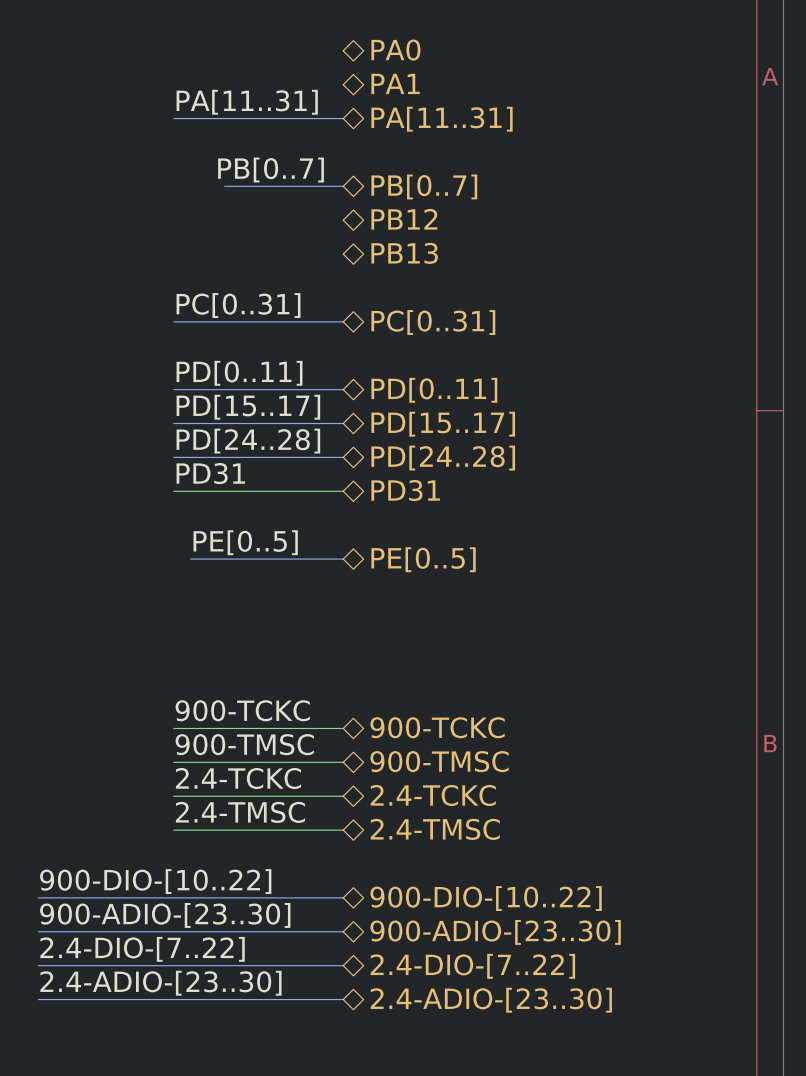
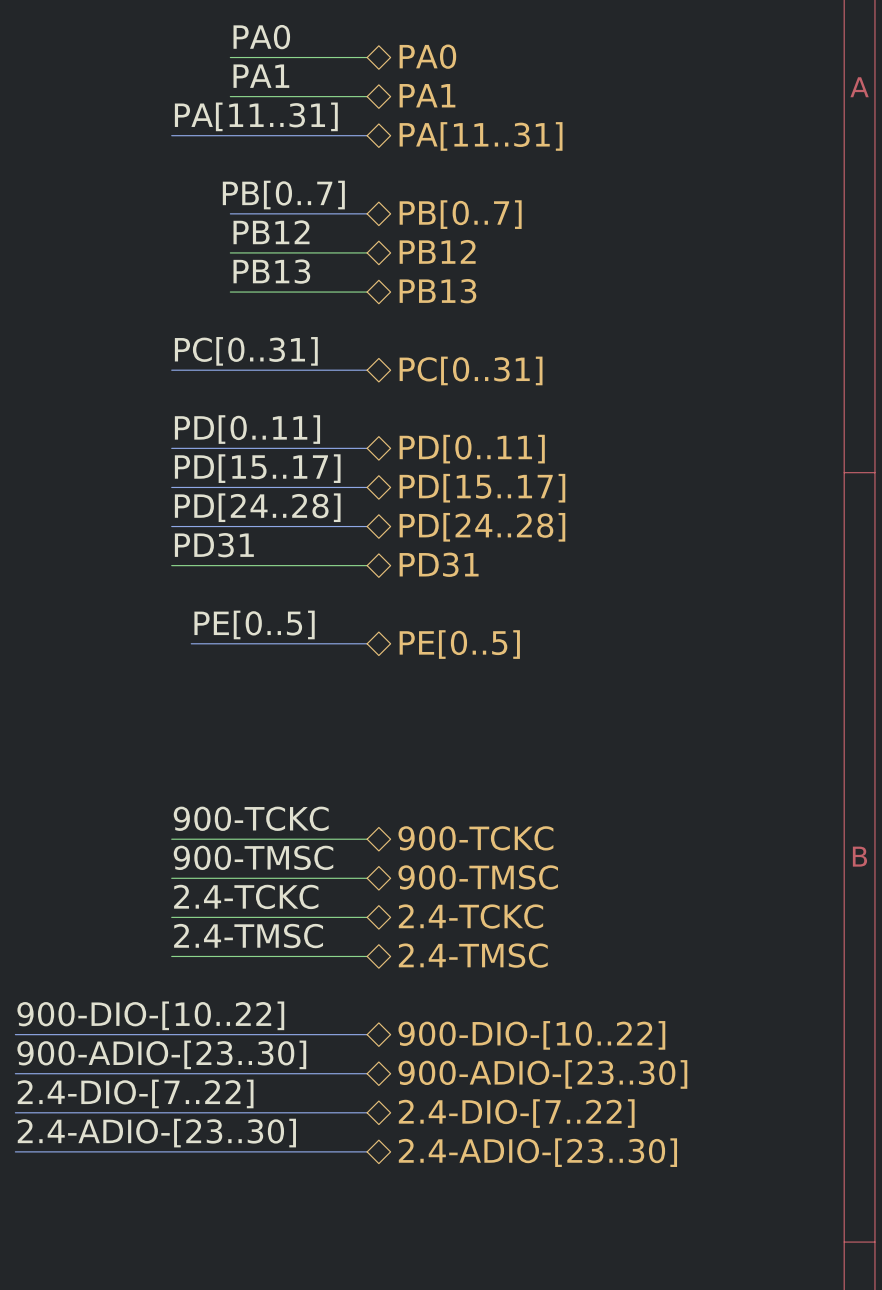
label: none -> PA0 (261, 37)
wire: none -> (230, 57) (367, 57)
label: none -> PA1 (261, 76)
wire: none -> (230, 96) (367, 96)
label: none -> PB12 (271, 232)
wire: none -> (230, 252) (367, 252)
label: none -> PB13 (271, 271)
wire: none -> (230, 292) (367, 292)

